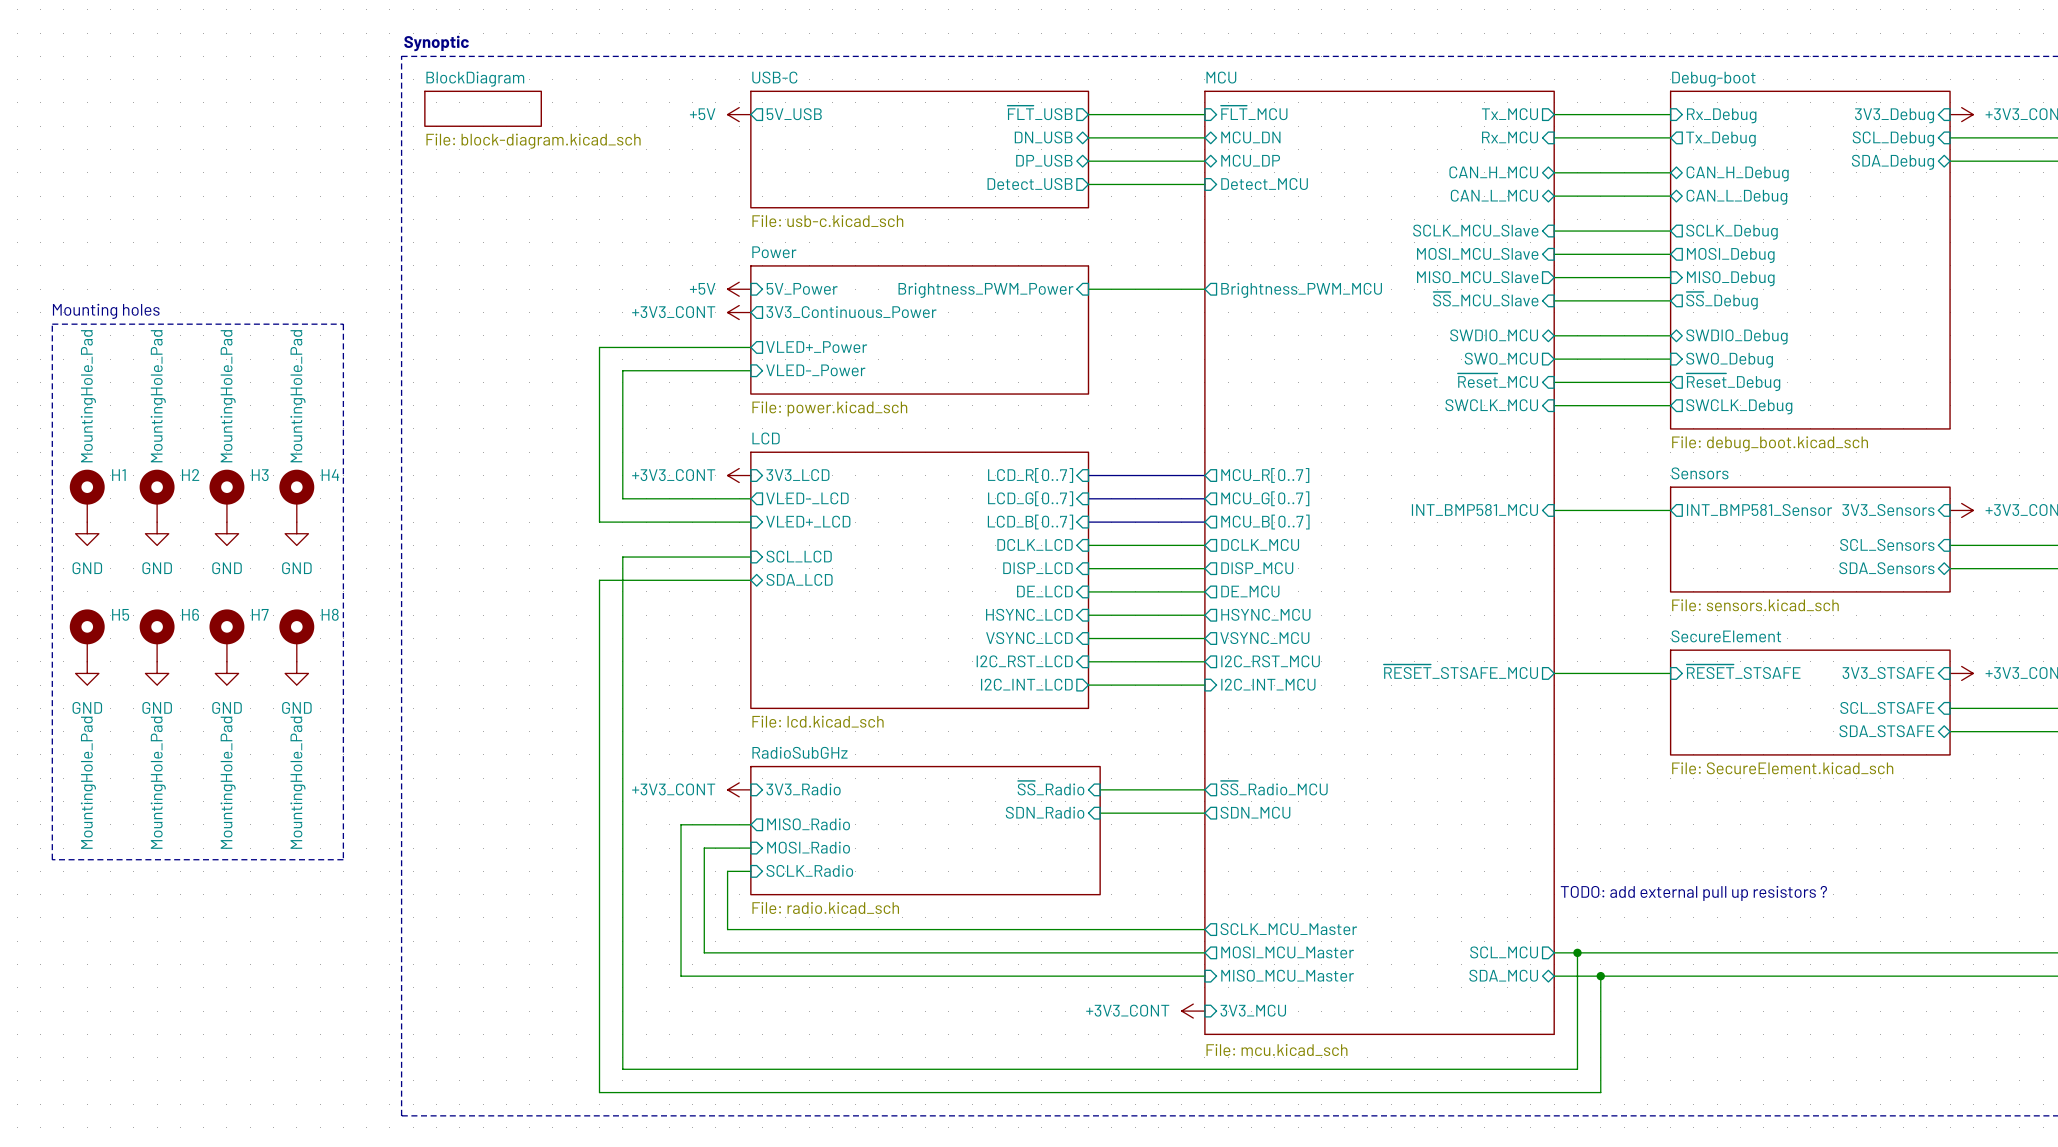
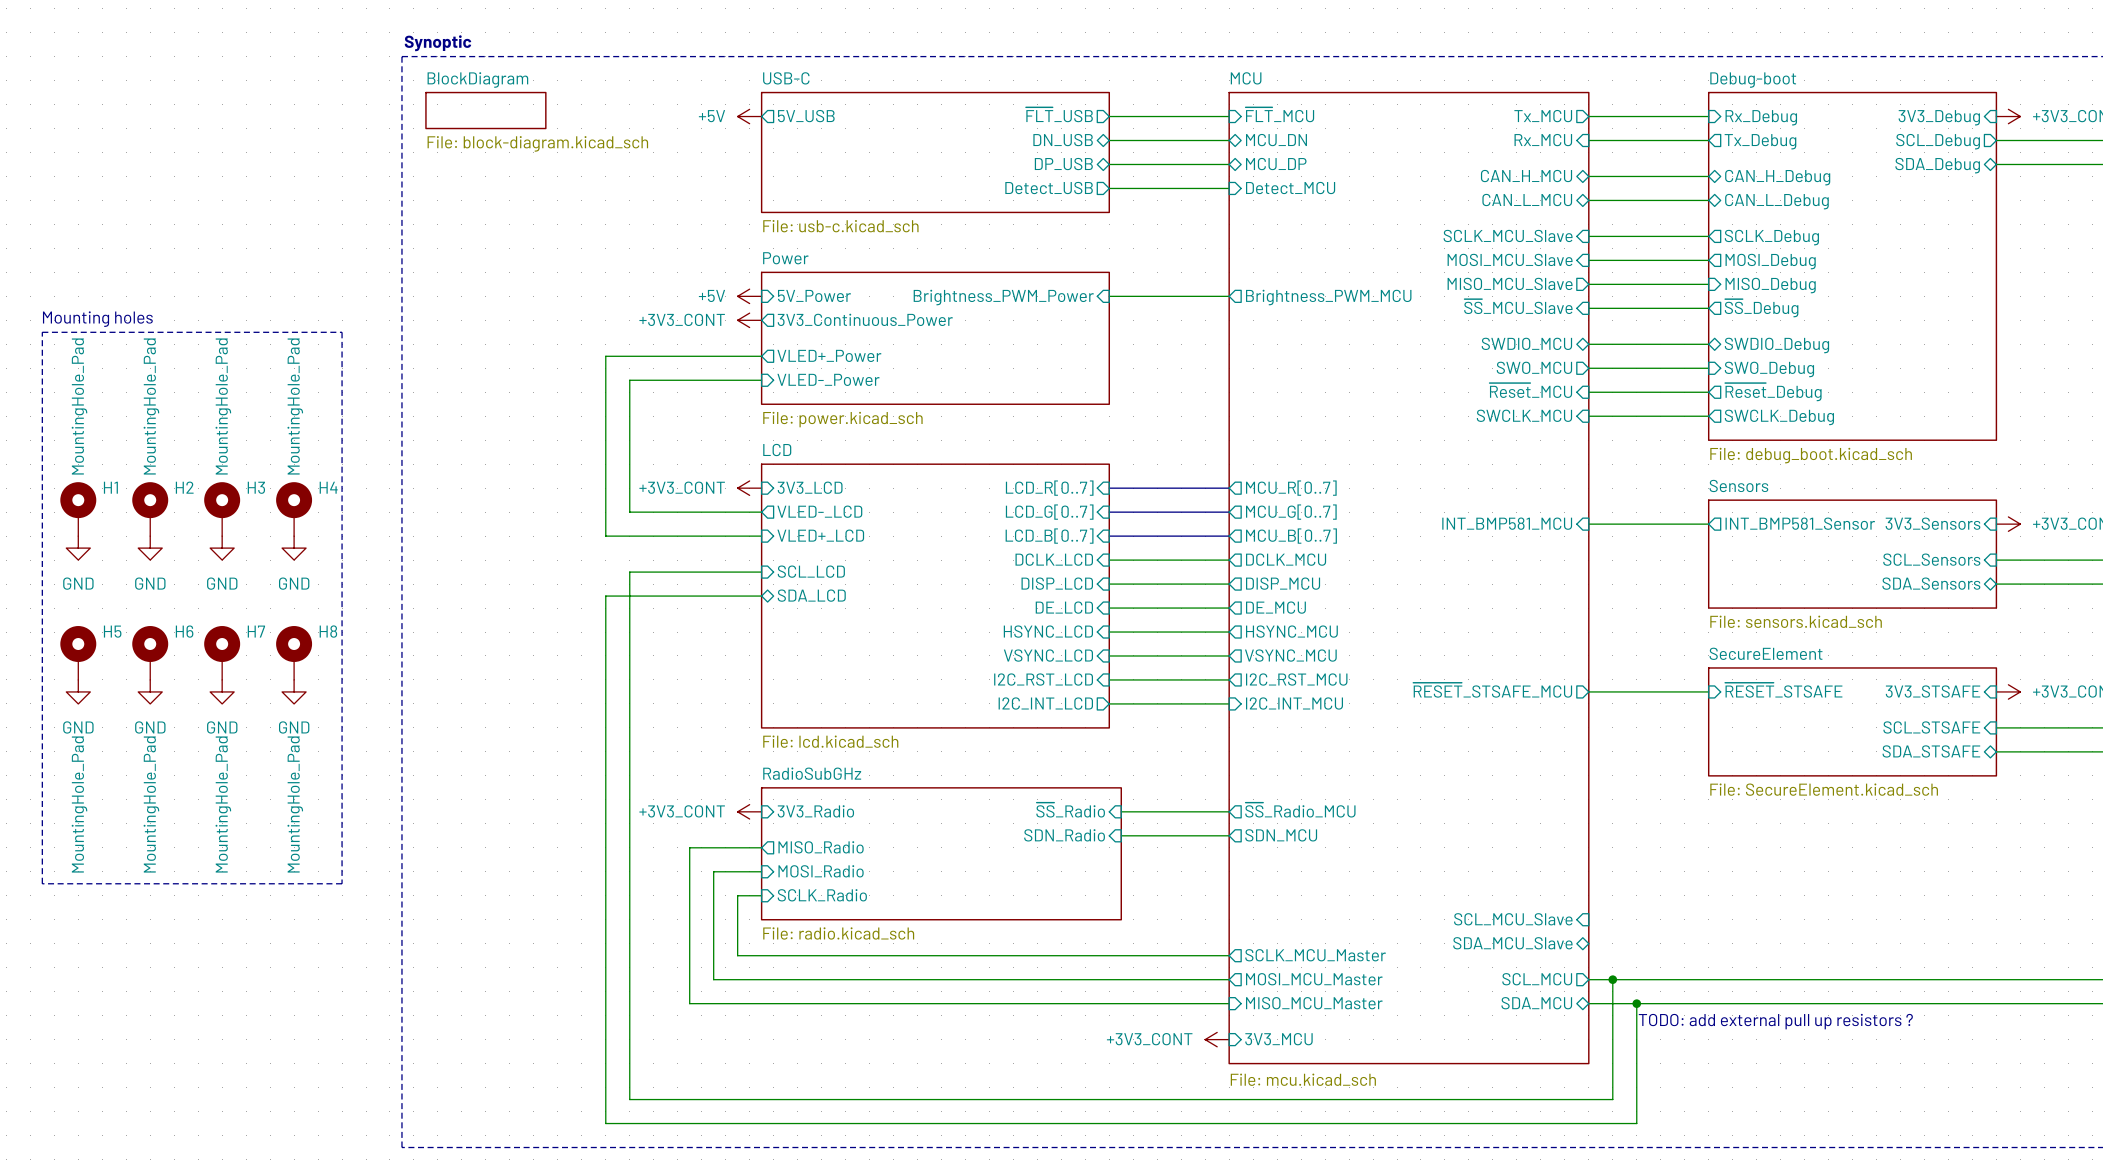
sheet pin shape: input (1893, 139) -> output (1938, 141)
text position: TODO: add external pull up resistors ? (1693, 893) -> TODO: add external pull up resistors ? (1775, 1021)
sheet pin: none -> SCL_MCU_Slave (1513, 919)
sheet pin: none -> SDA_MCU_Slave (1512, 943)

